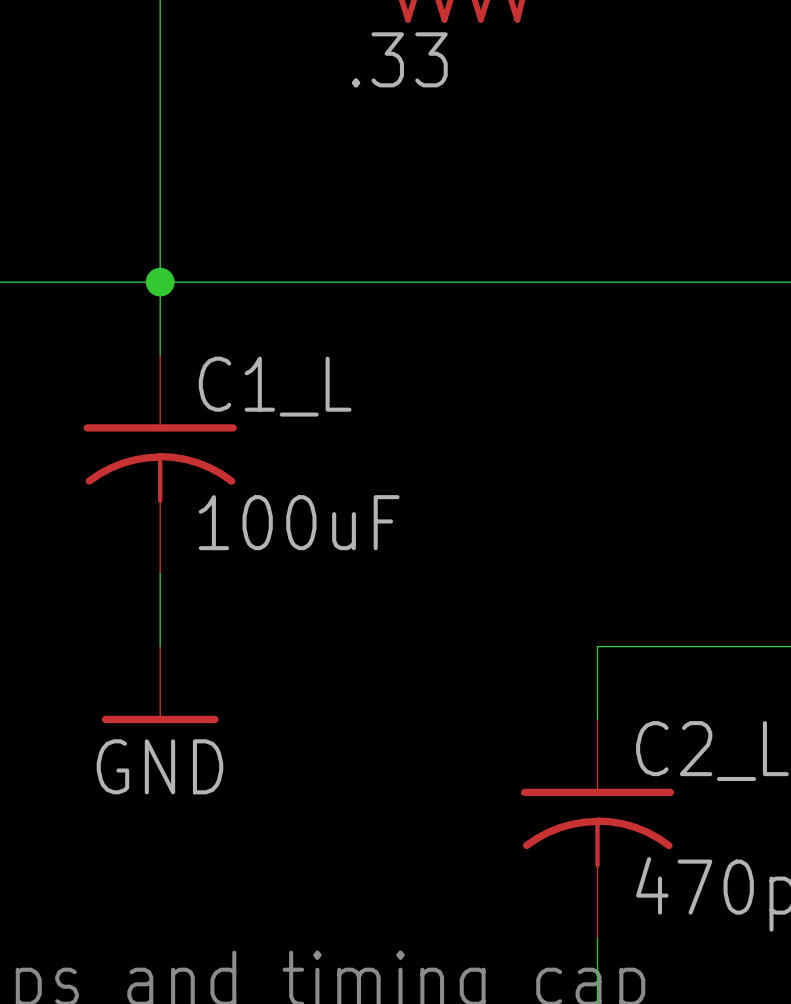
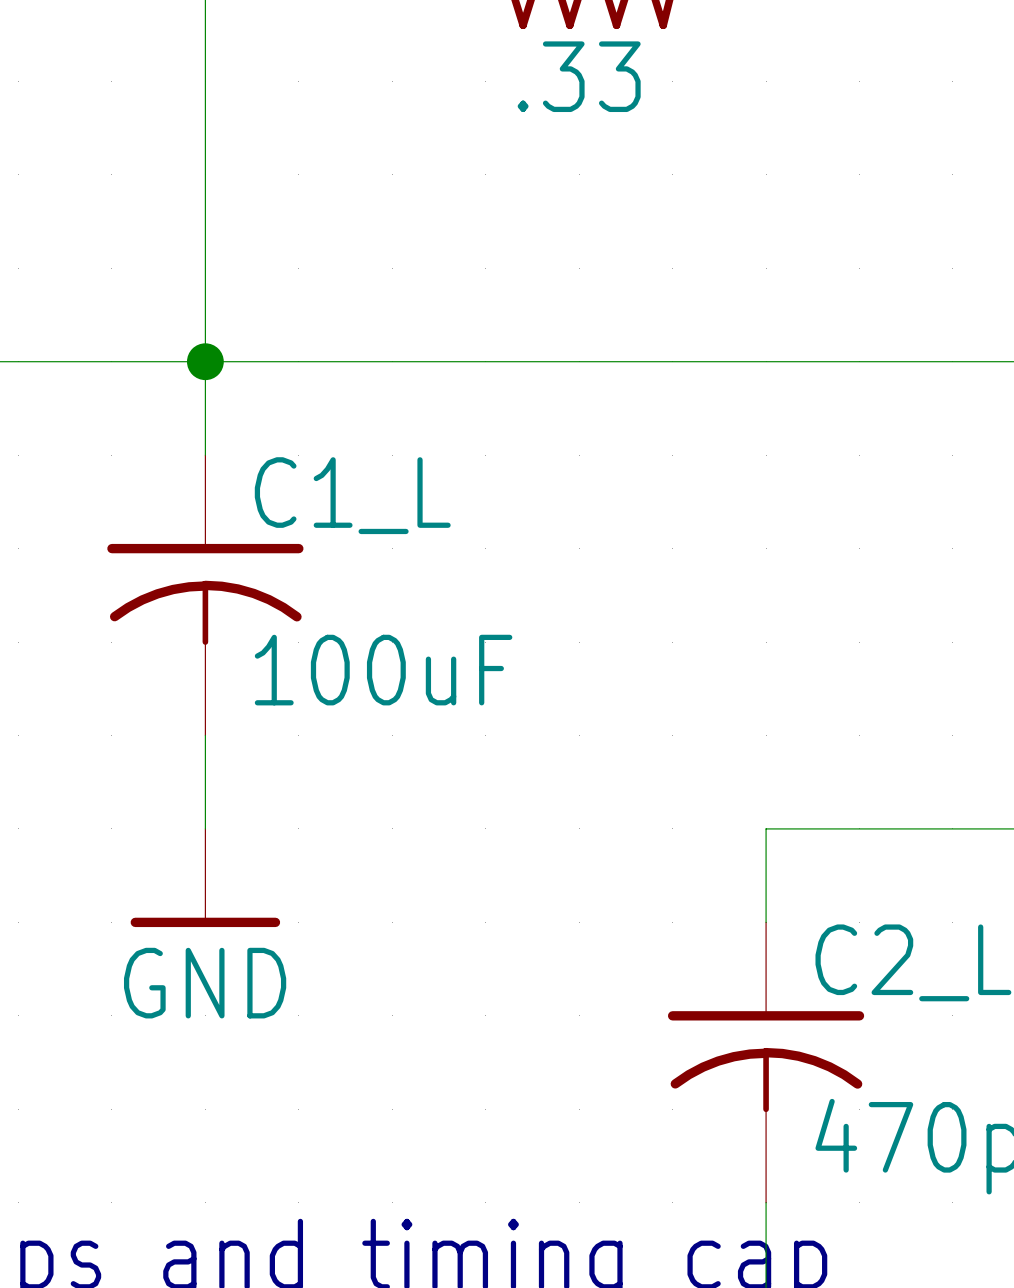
part value position: .33 (399, 59) -> .33 (579, 76)

